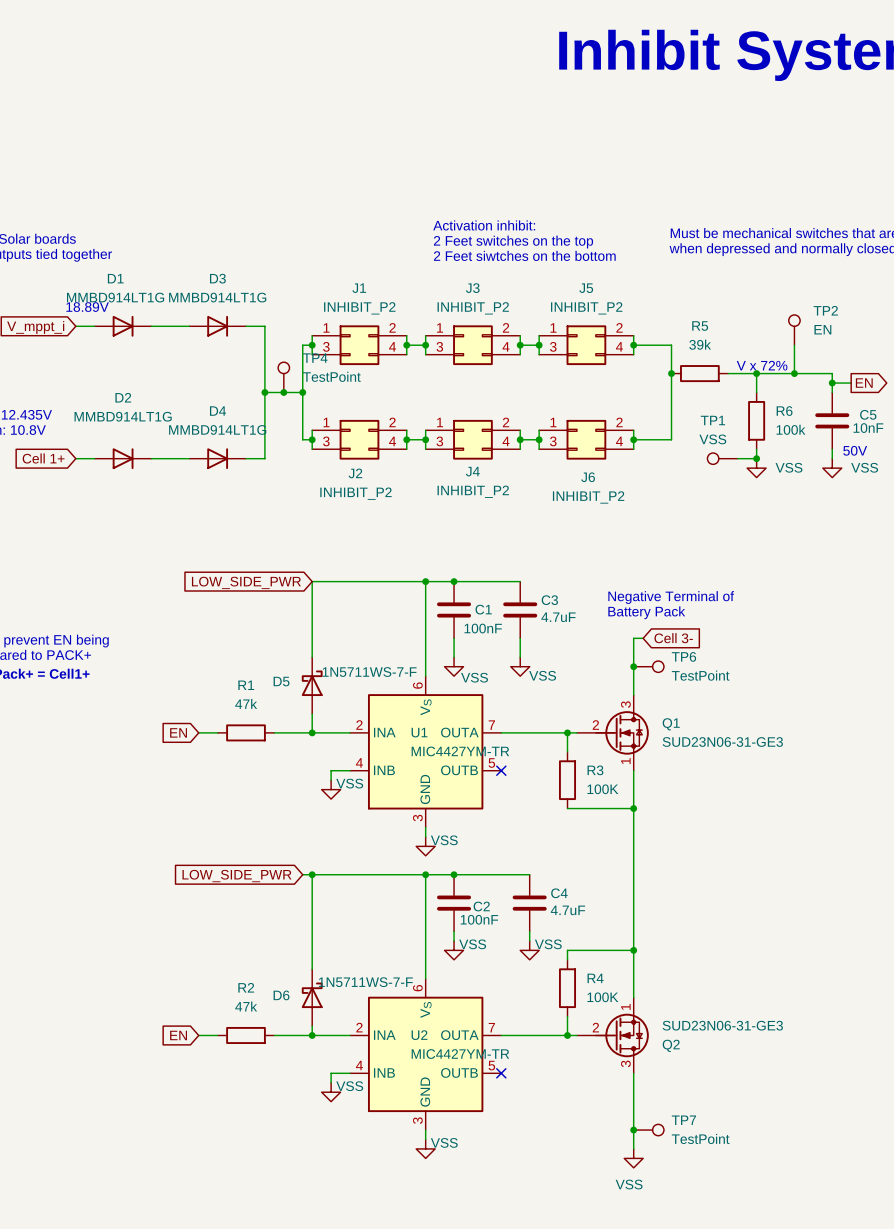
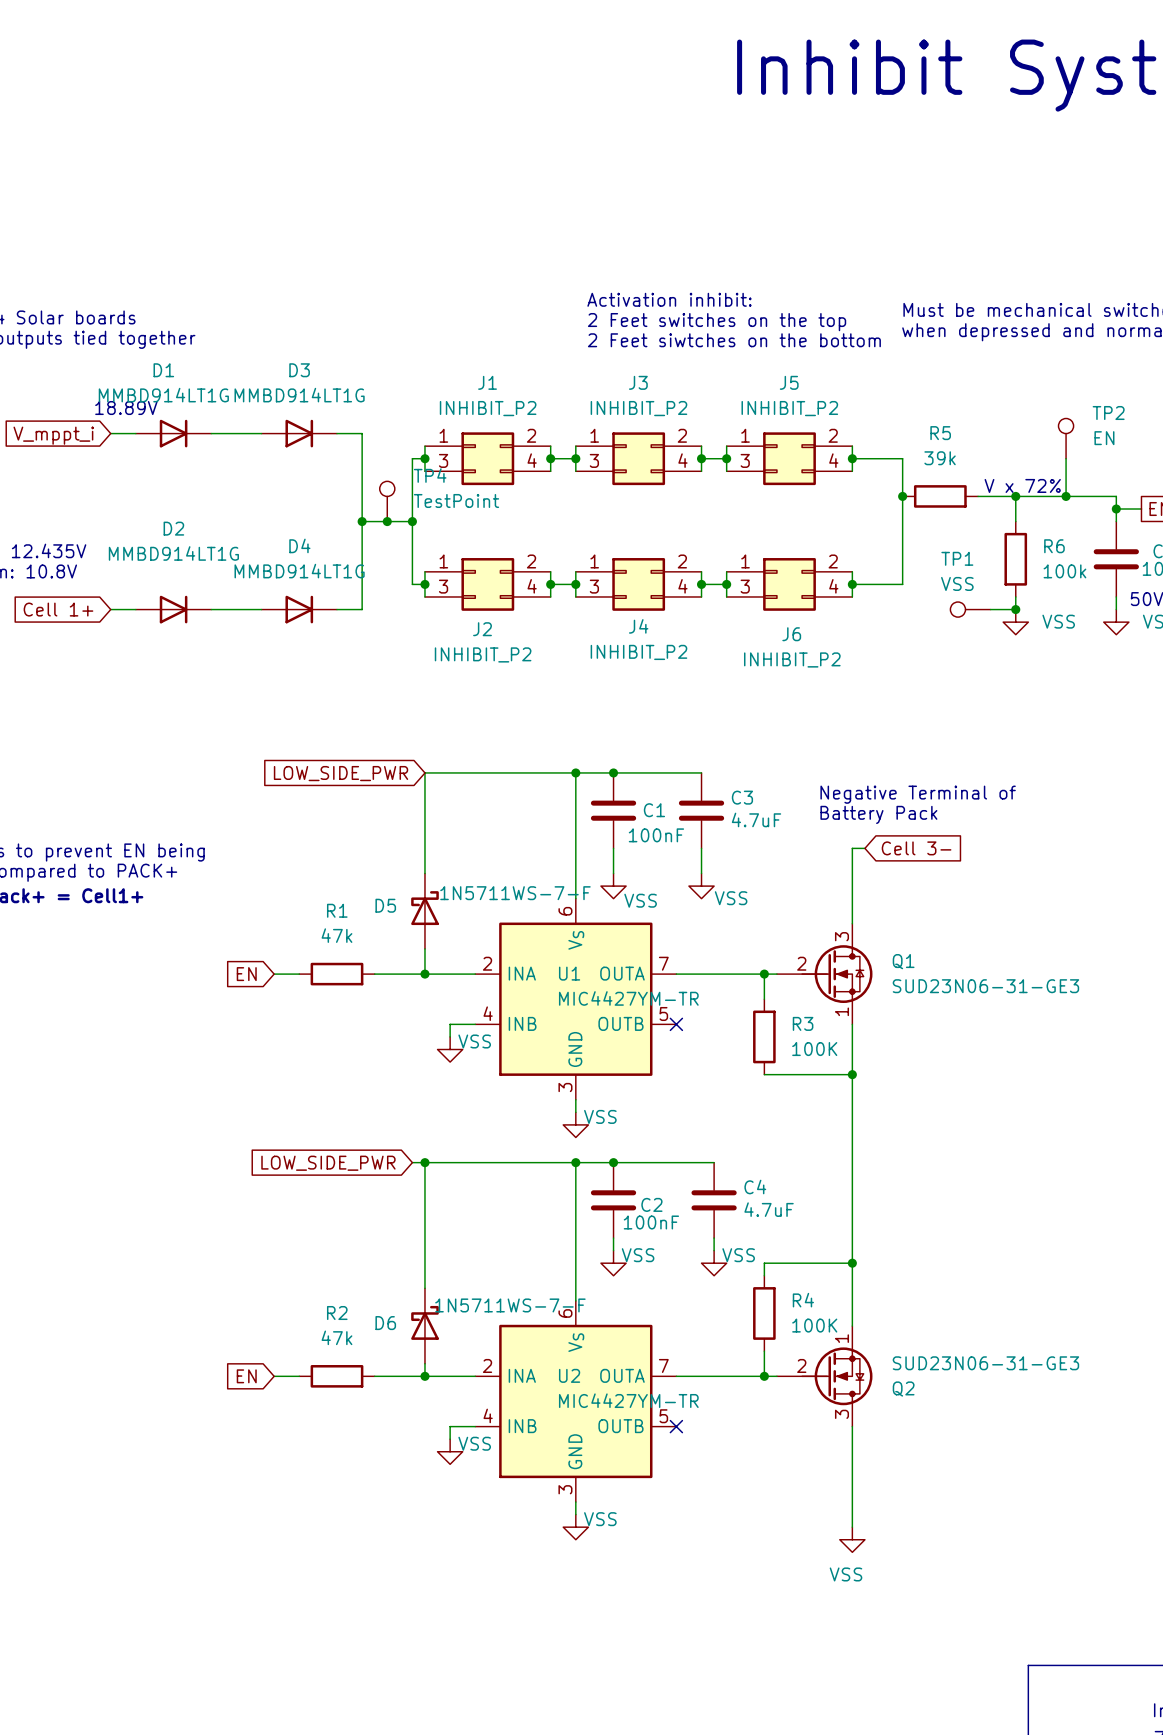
junction: (633, 666) -> none
TP6: TestPoint (648, 666) -> none
junction: (633, 1130) -> none
TP7: TestPoint (648, 1130) -> none

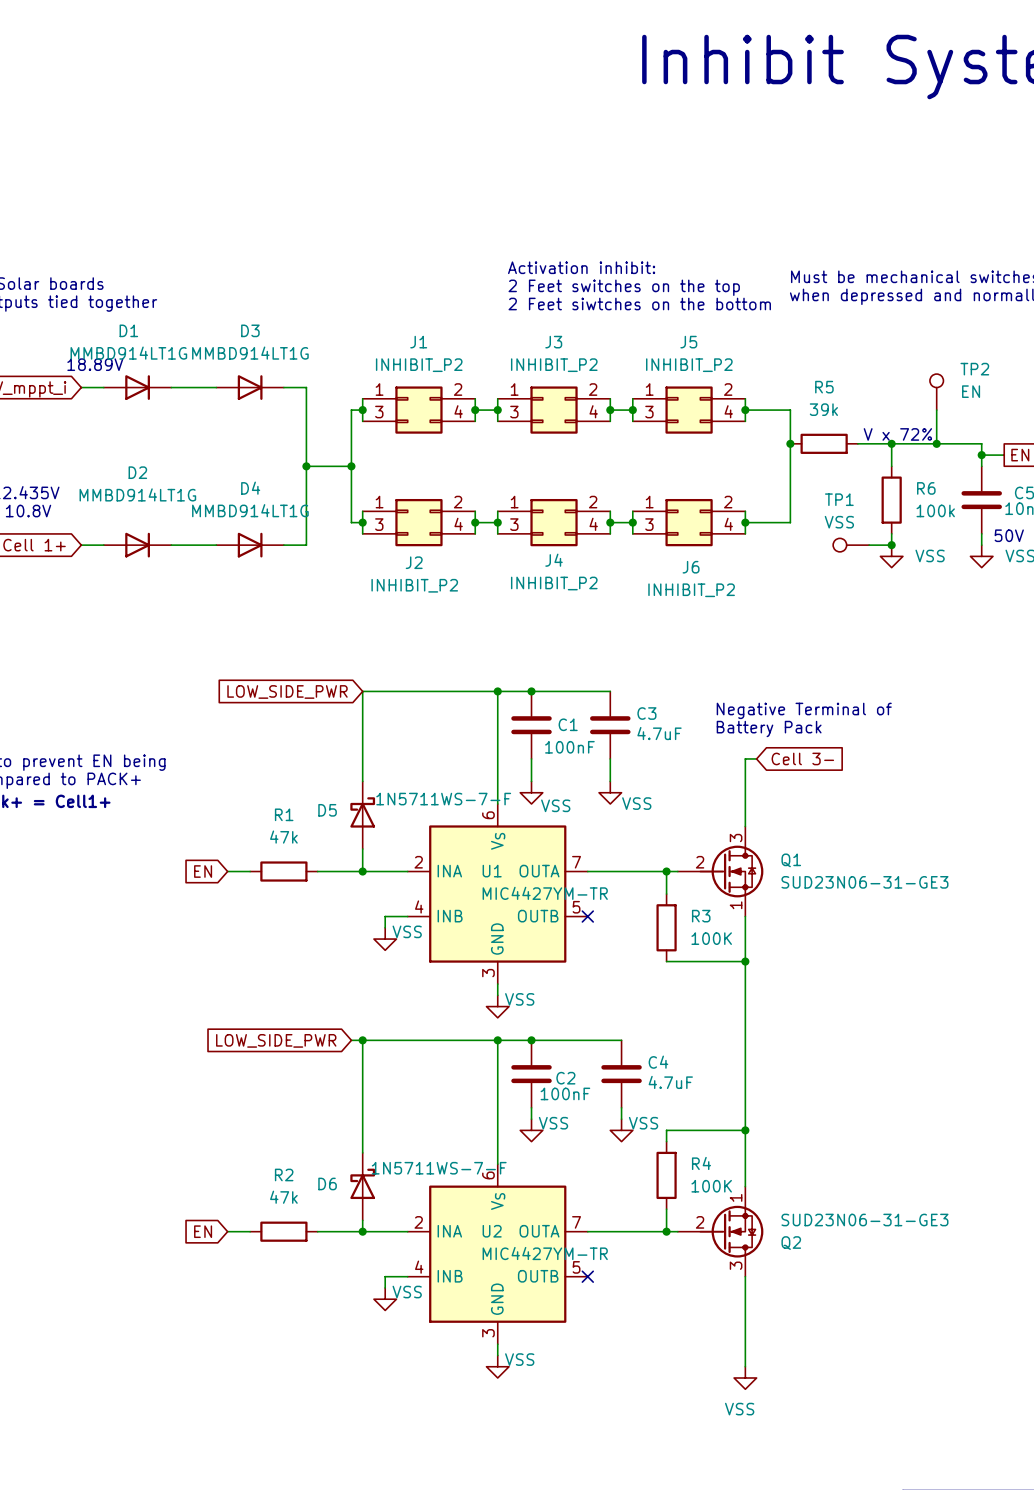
TP4: TestPoint (387, 501) -> none
junction: (387, 521) -> none

